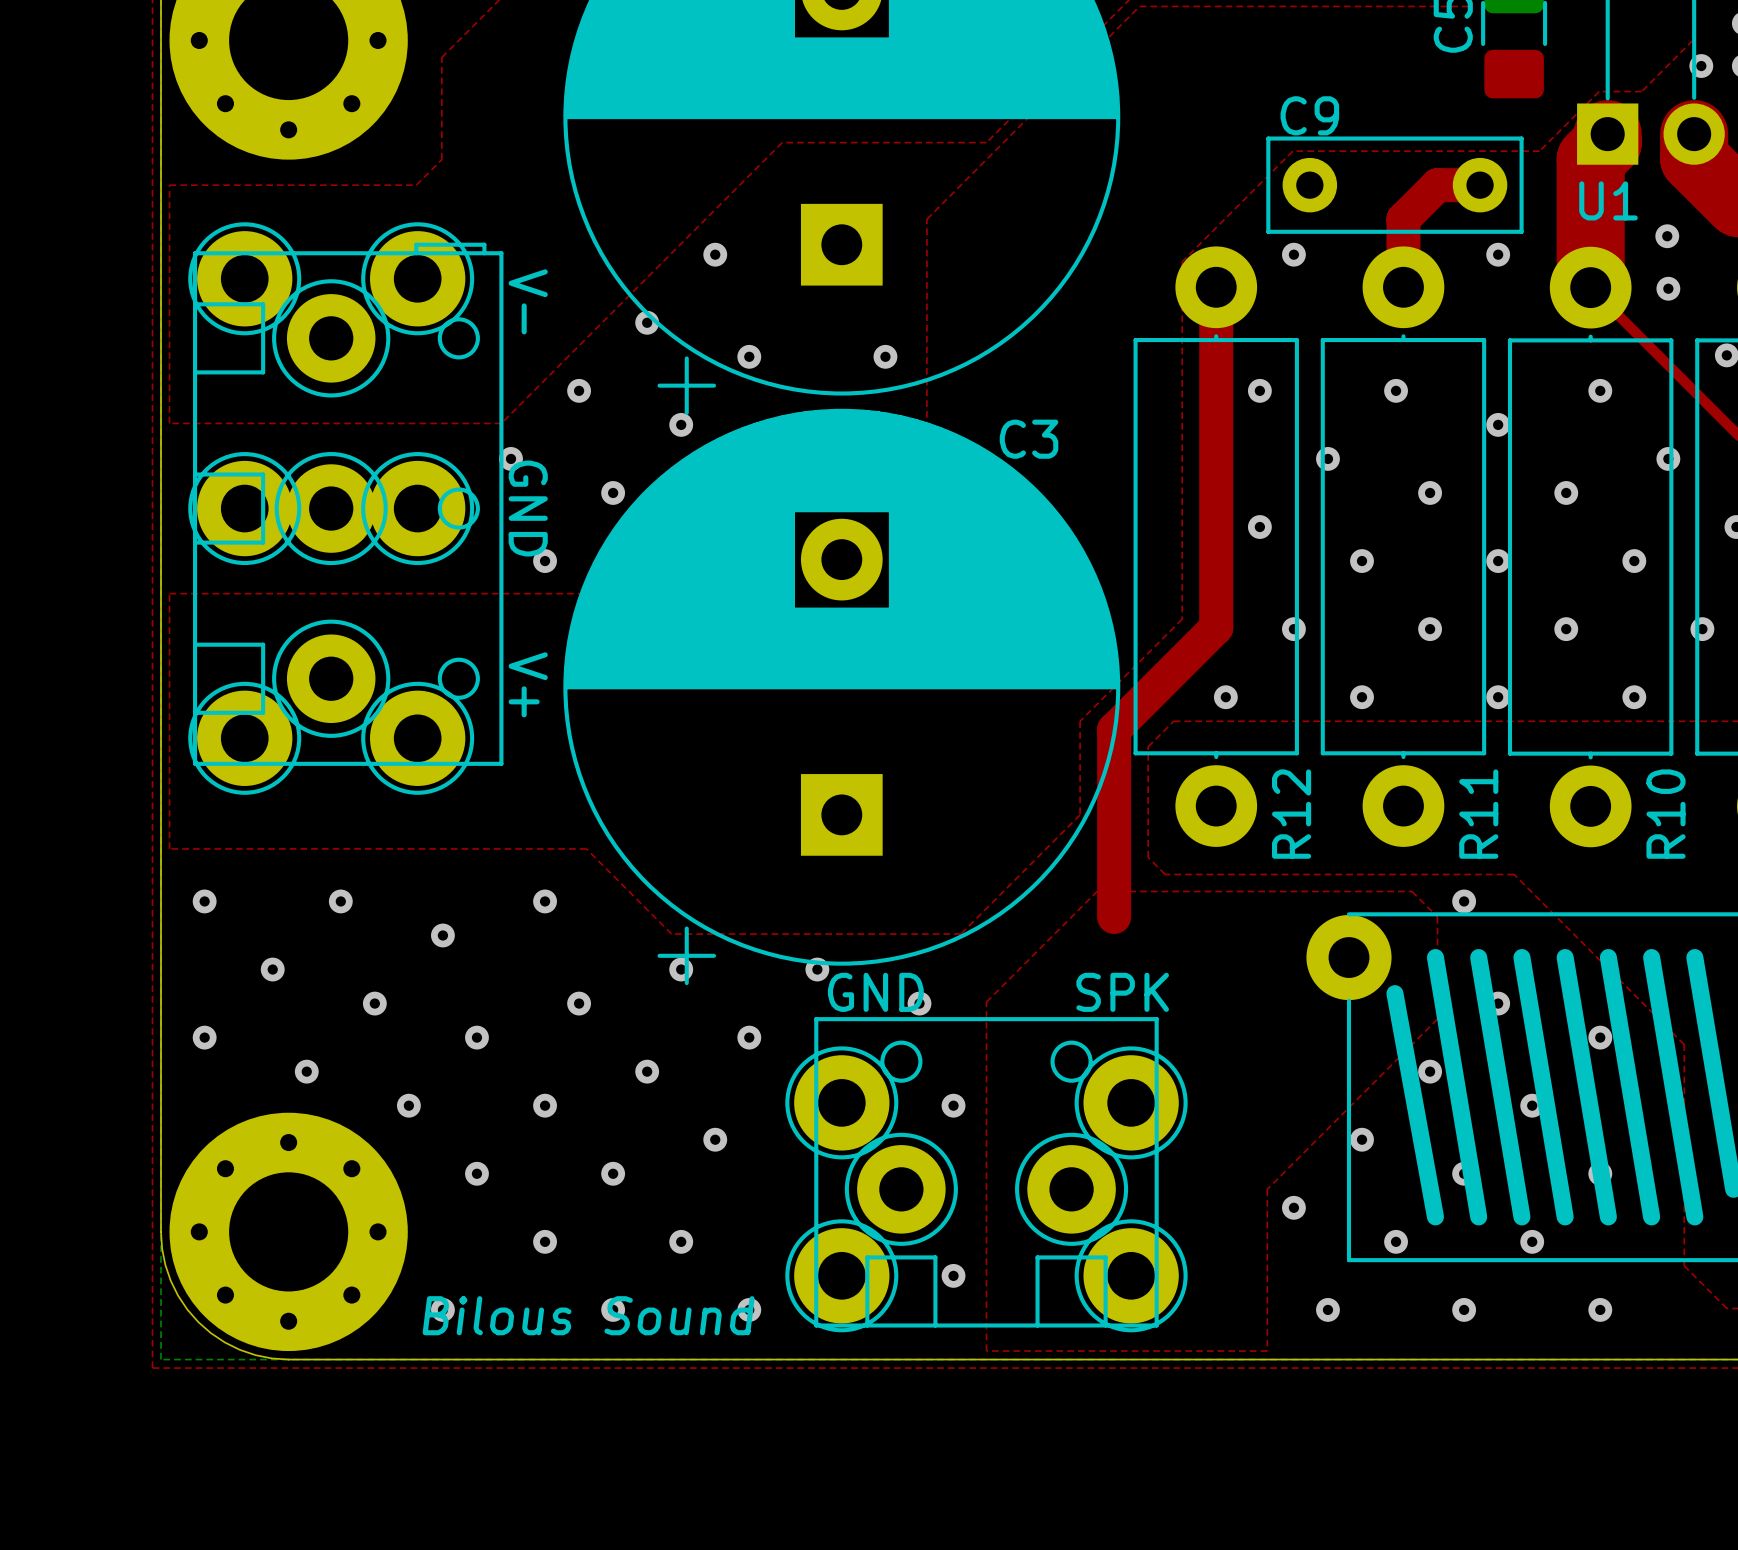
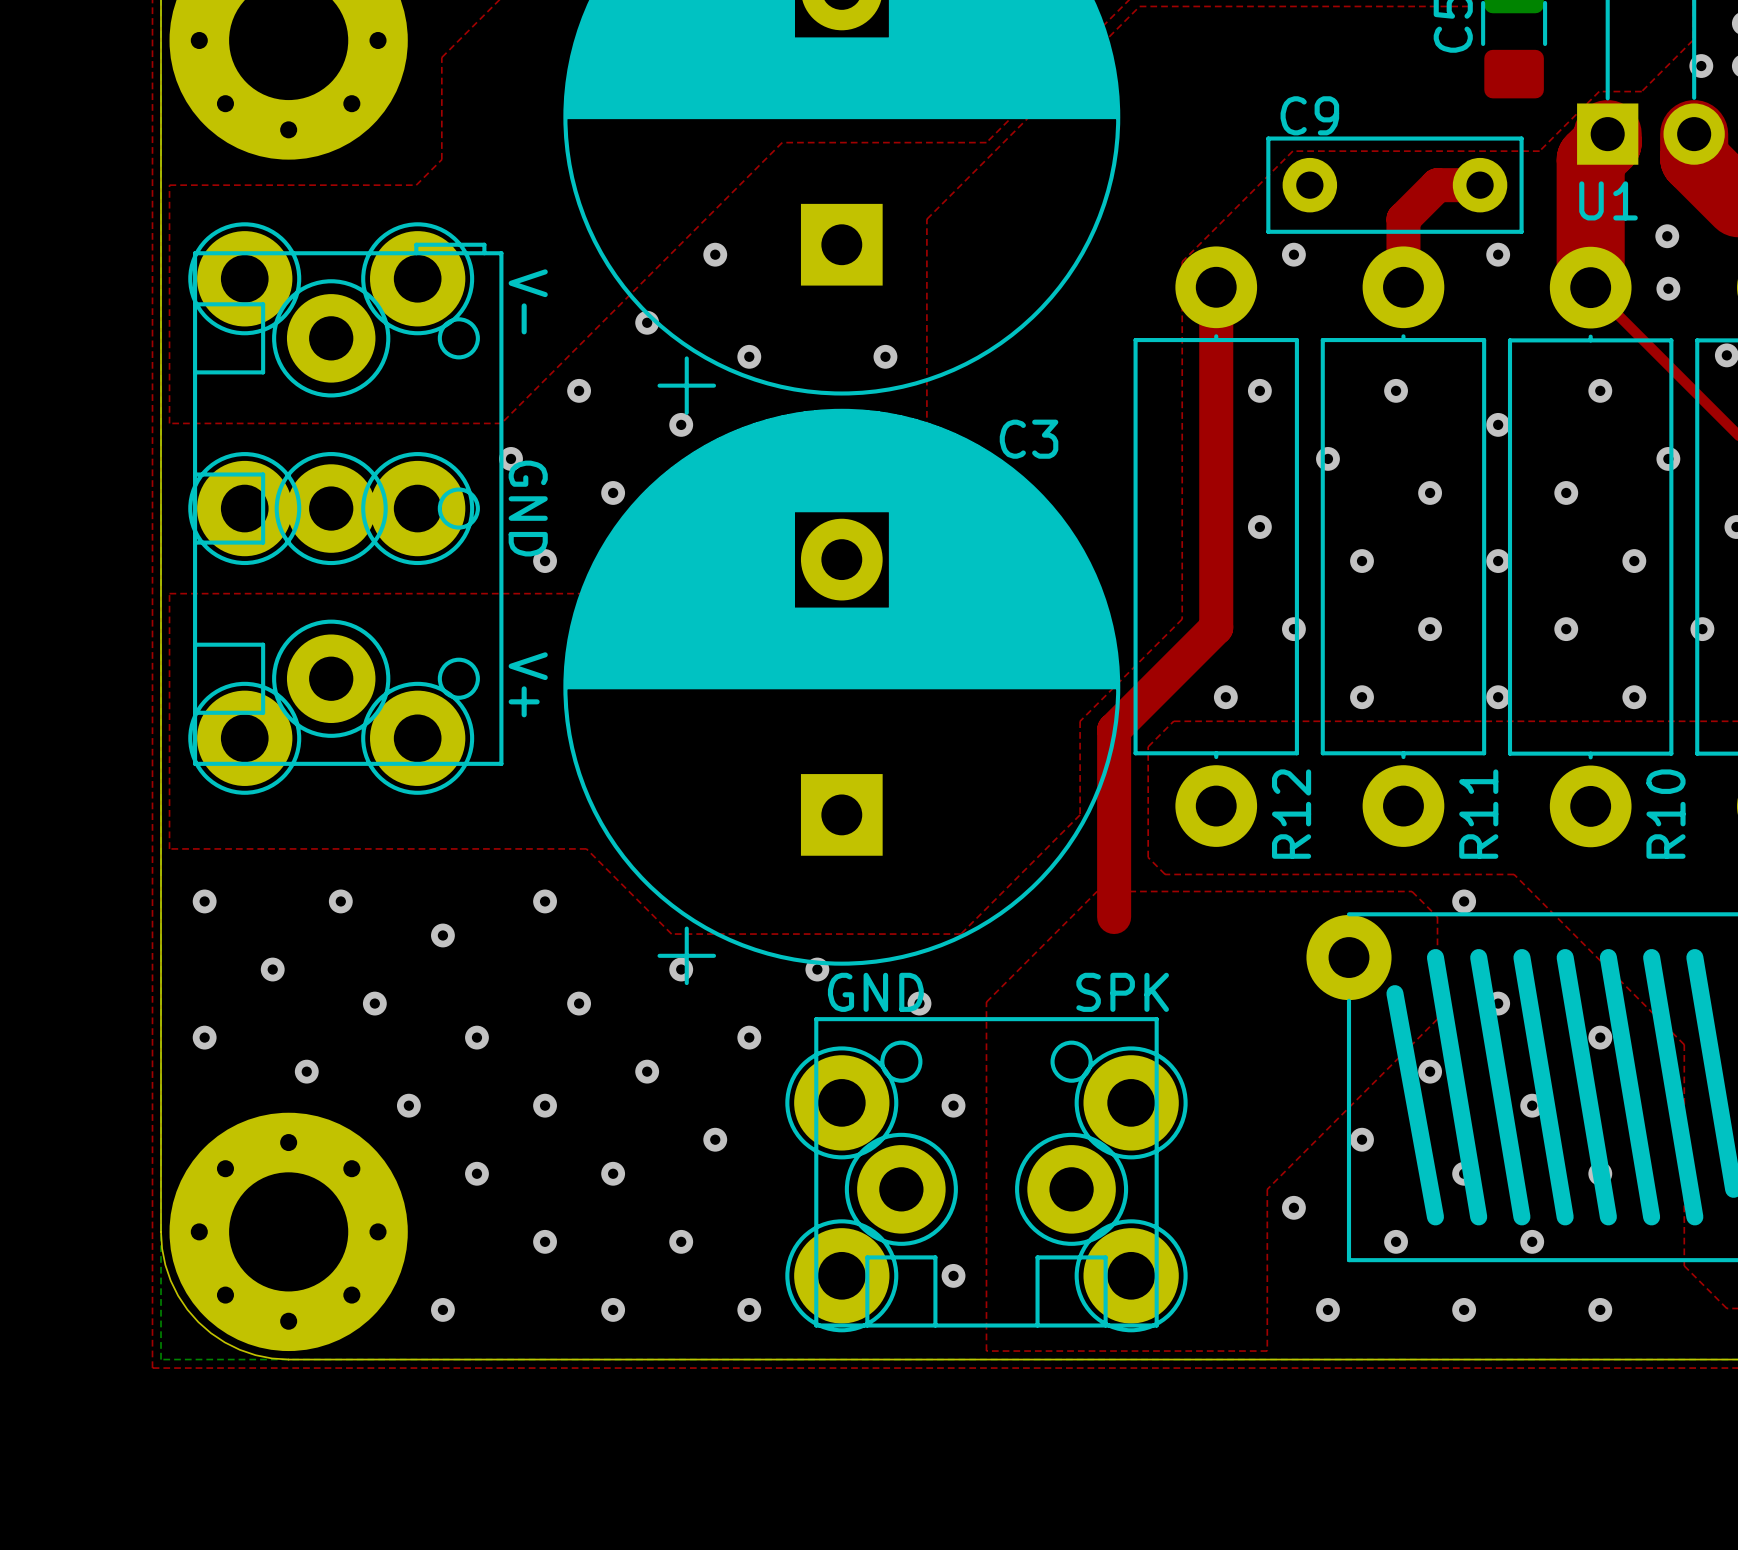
text: Bilous Sound (588, 1315) -> none

